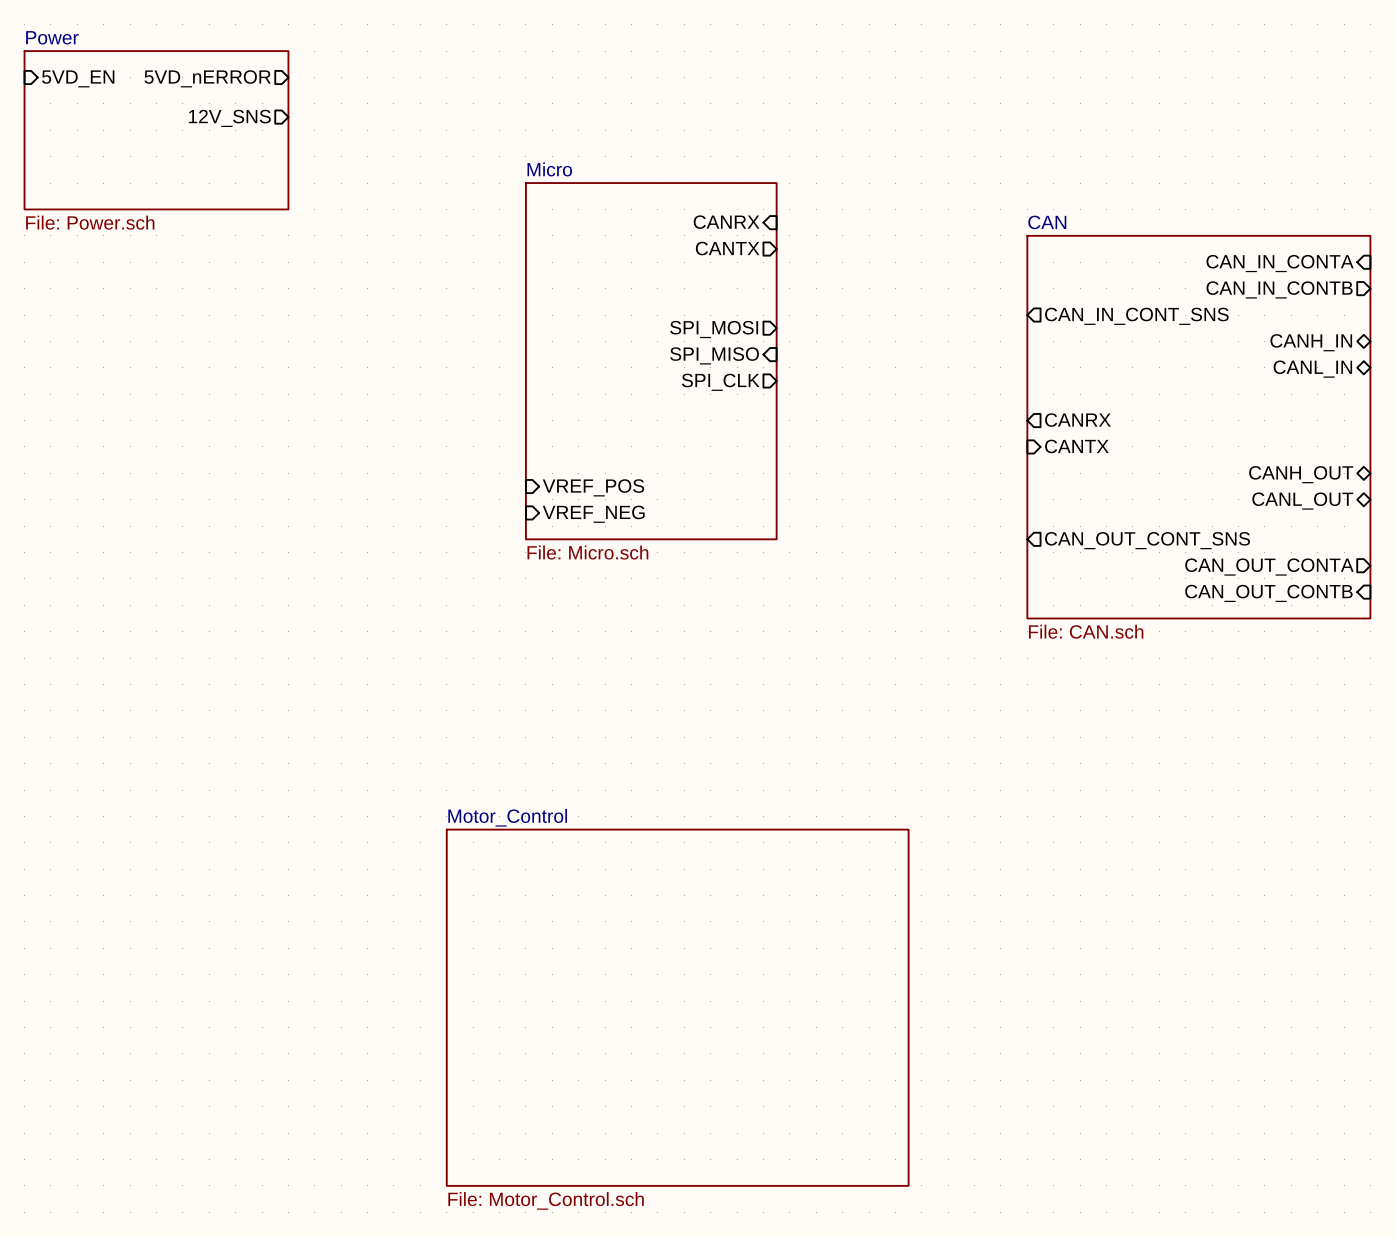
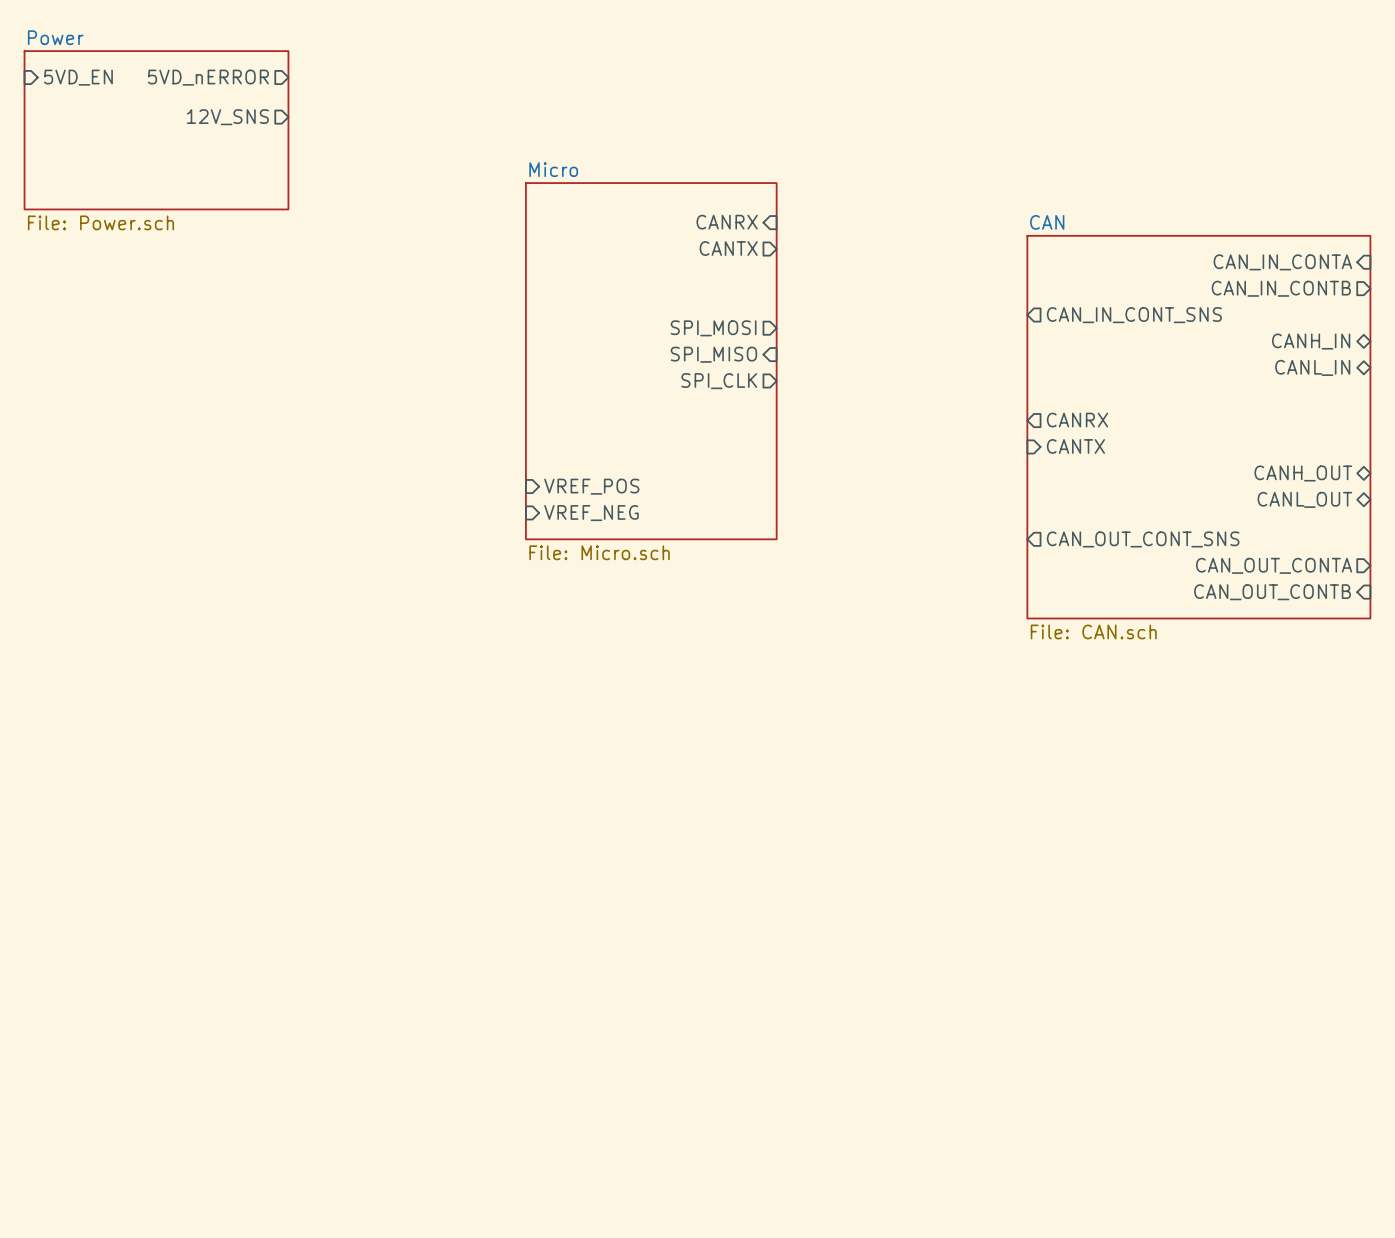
sheet Motor_Control: File: Motor_Control.sch (677, 1007) -> none

